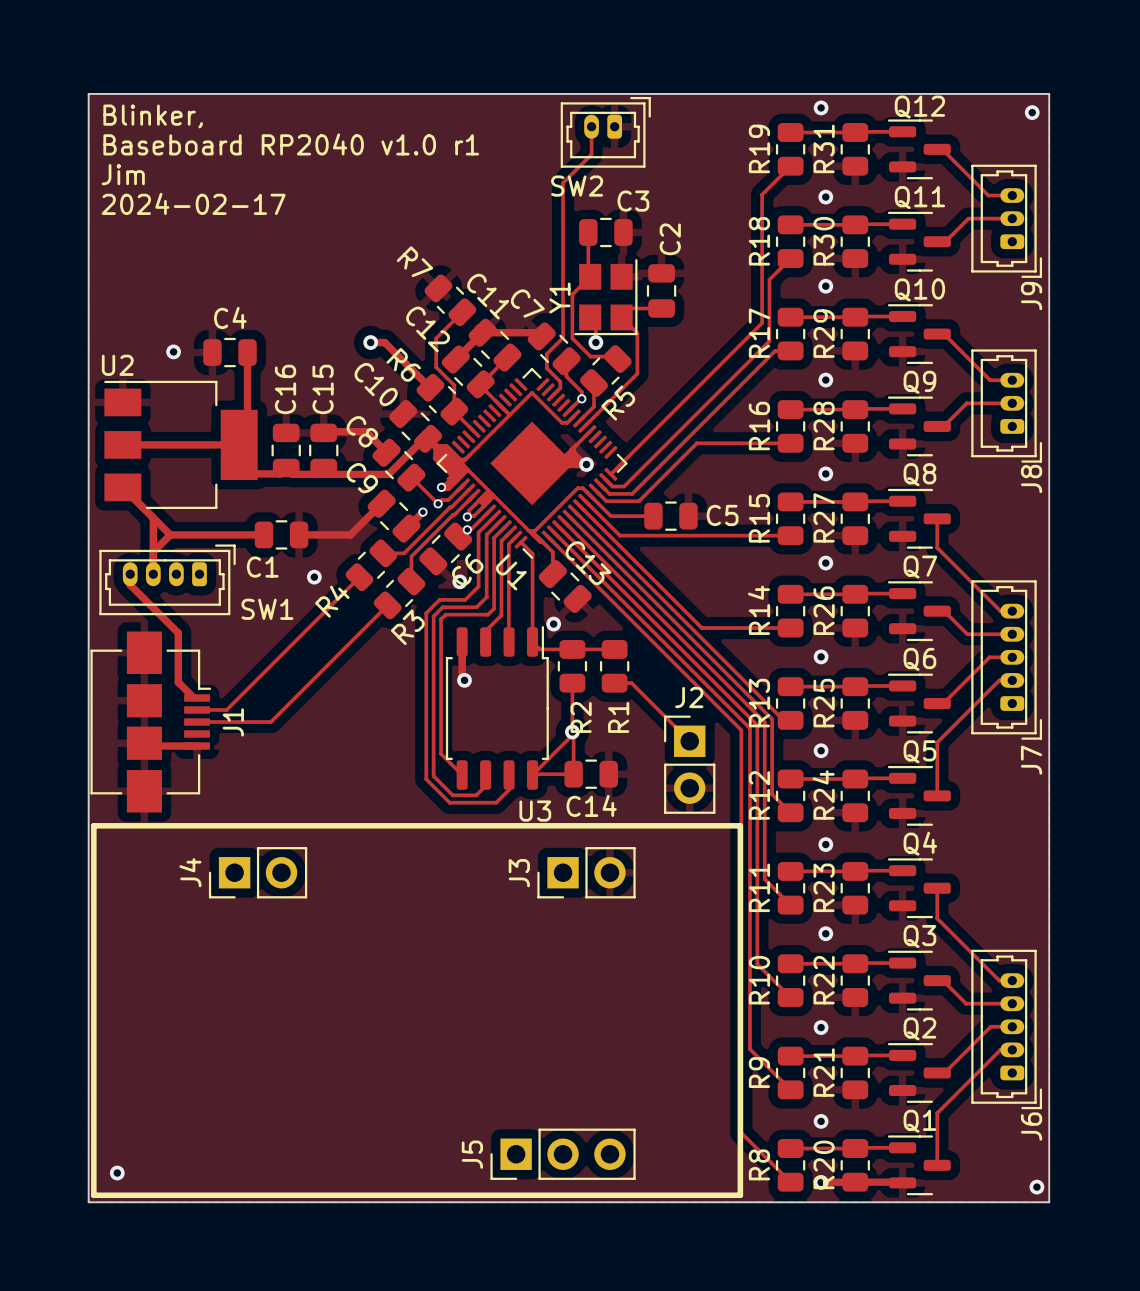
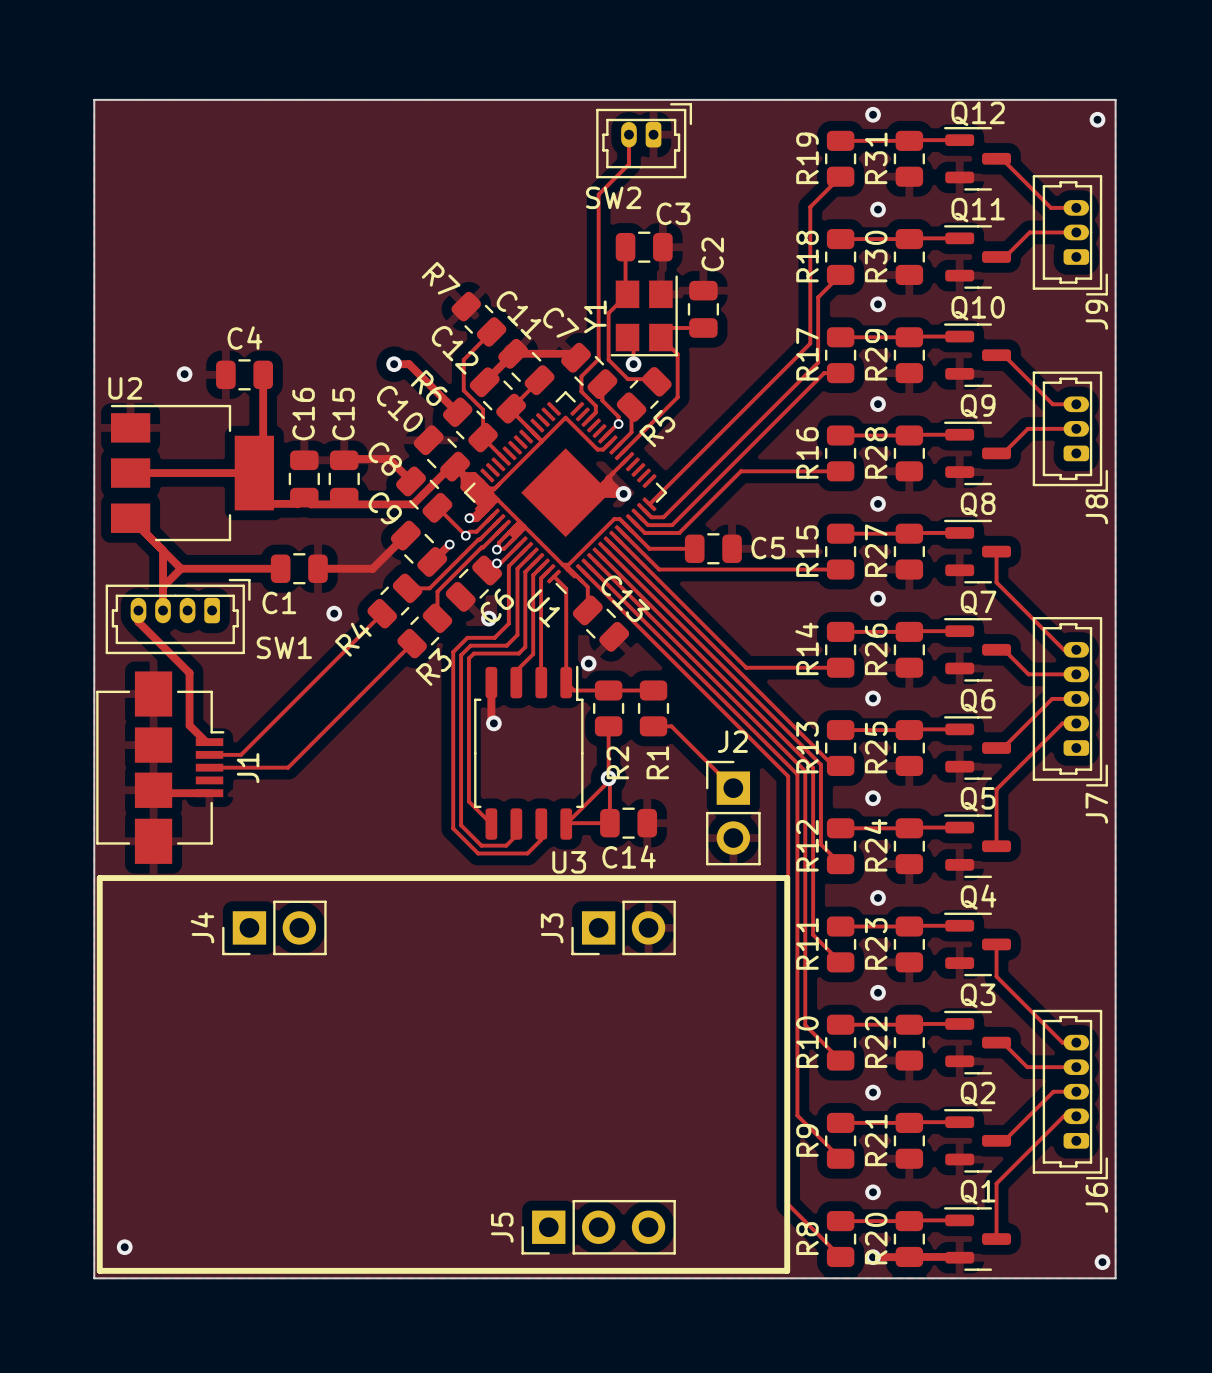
text: Blinker, (153, 116) -> none
text: Baseboard RP2040 v1.0 r1 (291, 144) -> none
text: Jim (123, 174) -> none
text: 2024-02-17 (193, 203) -> none

